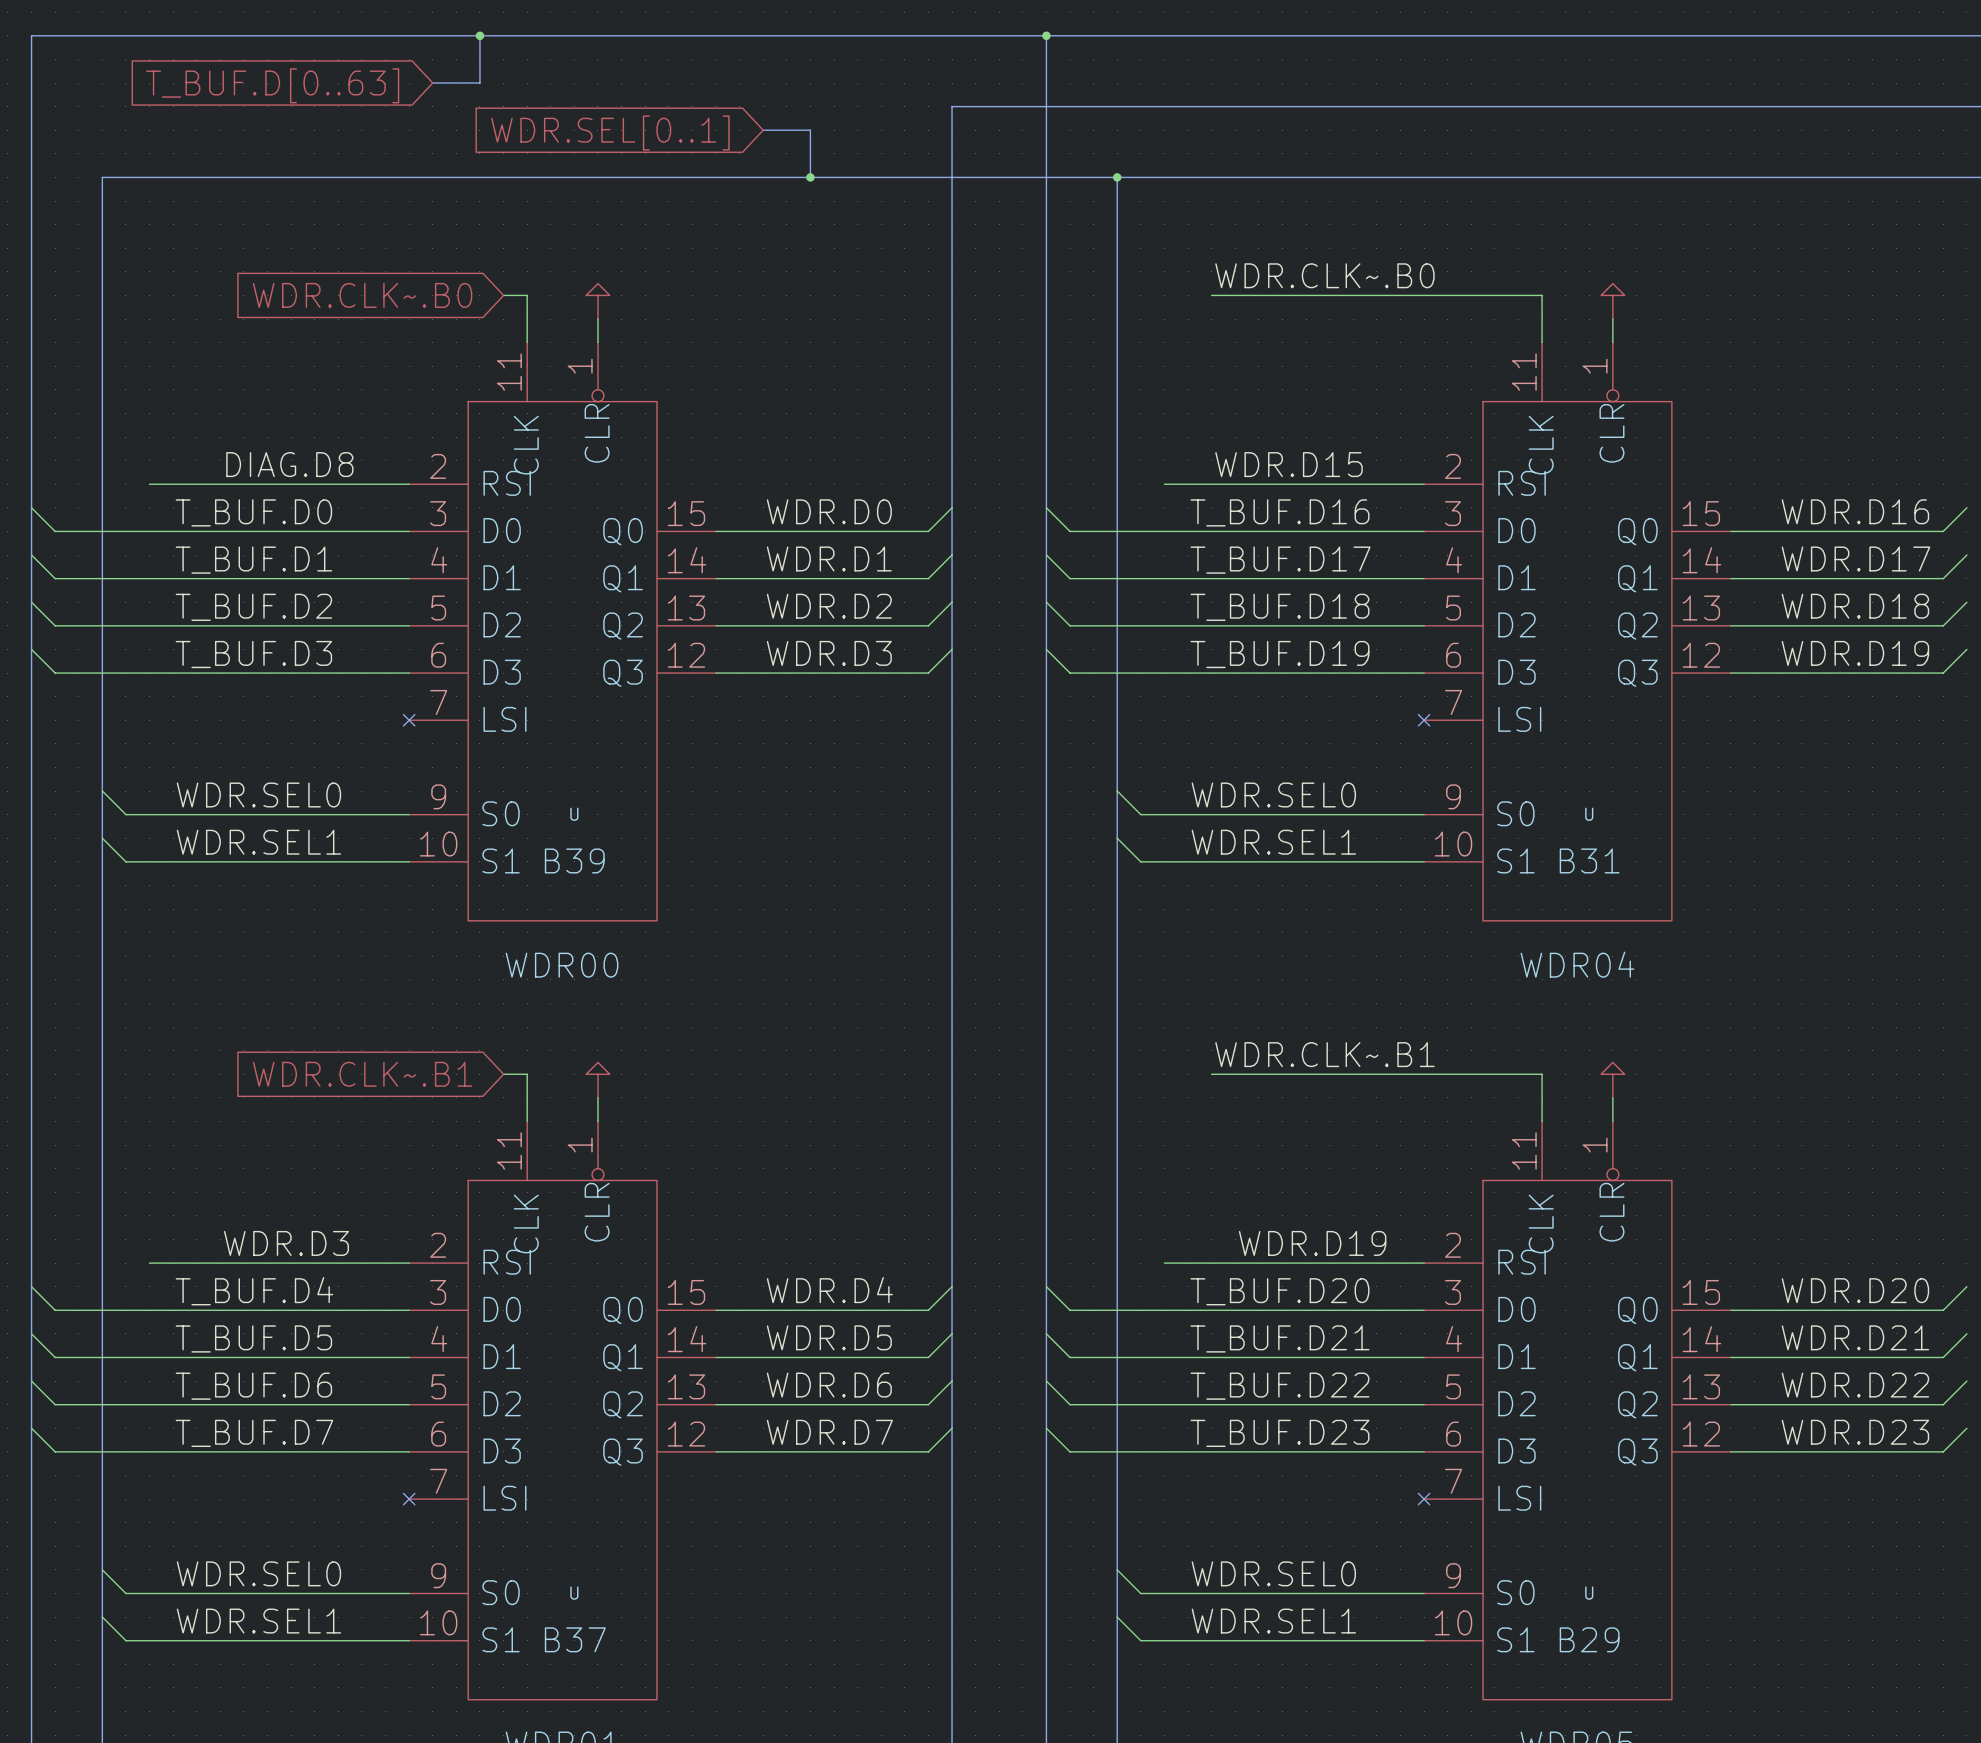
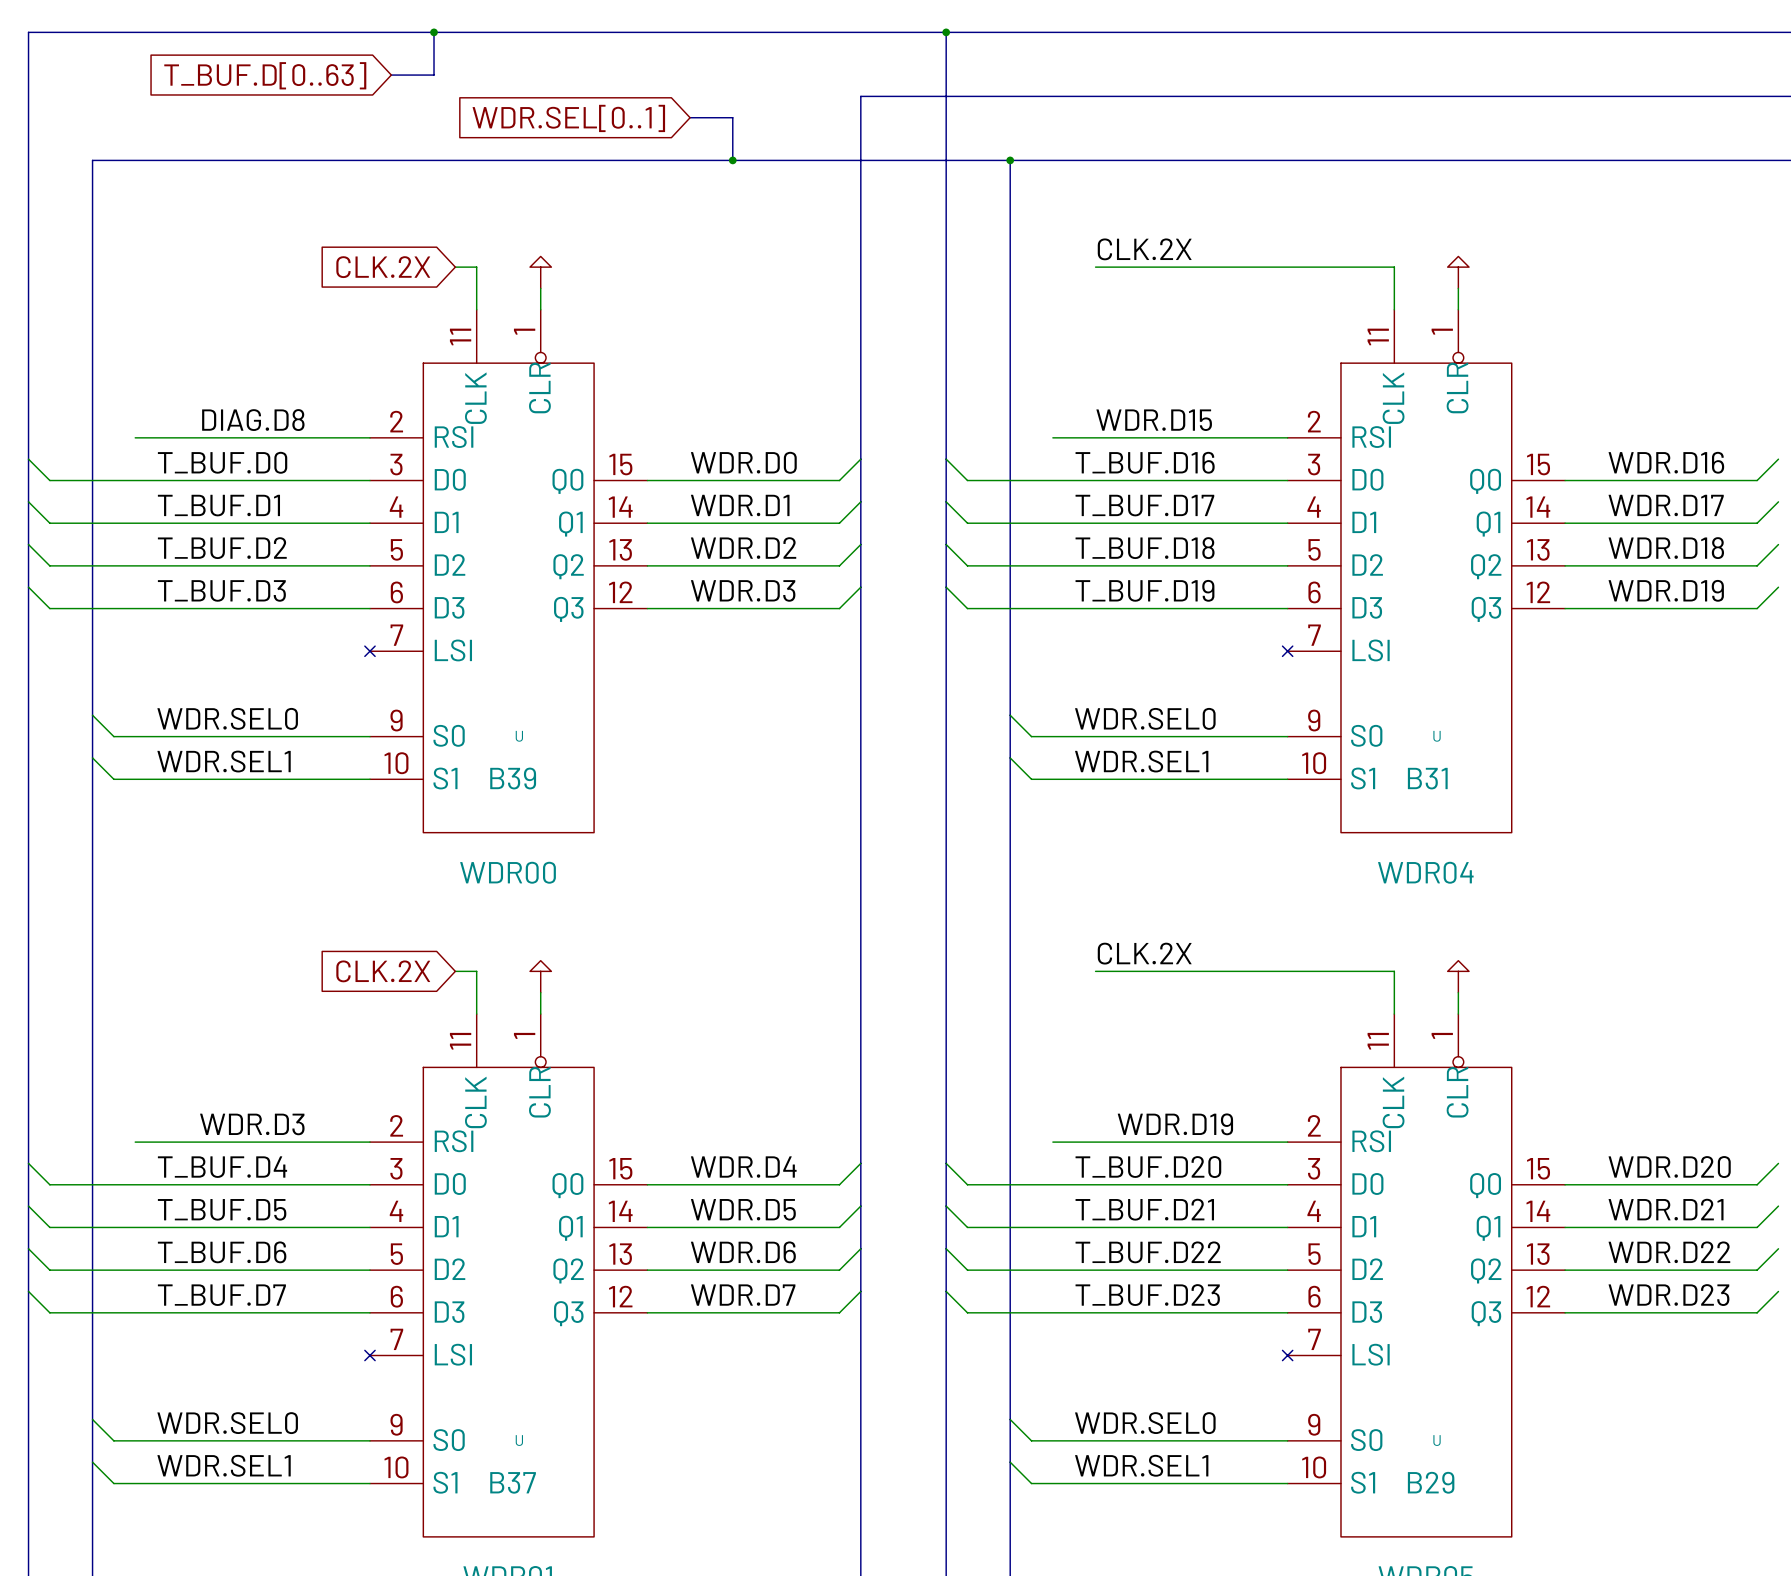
label: WDR.CLK~.B0 (1324, 275) -> CLK.2X (1144, 249)
global label: WDR.CLK~.B0 (362, 295) -> CLK.2X (383, 267)
label: WDR.CLK~.B1 (1324, 1054) -> CLK.2X (1144, 953)
global label: WDR.CLK~.B1 (362, 1074) -> CLK.2X (383, 971)

